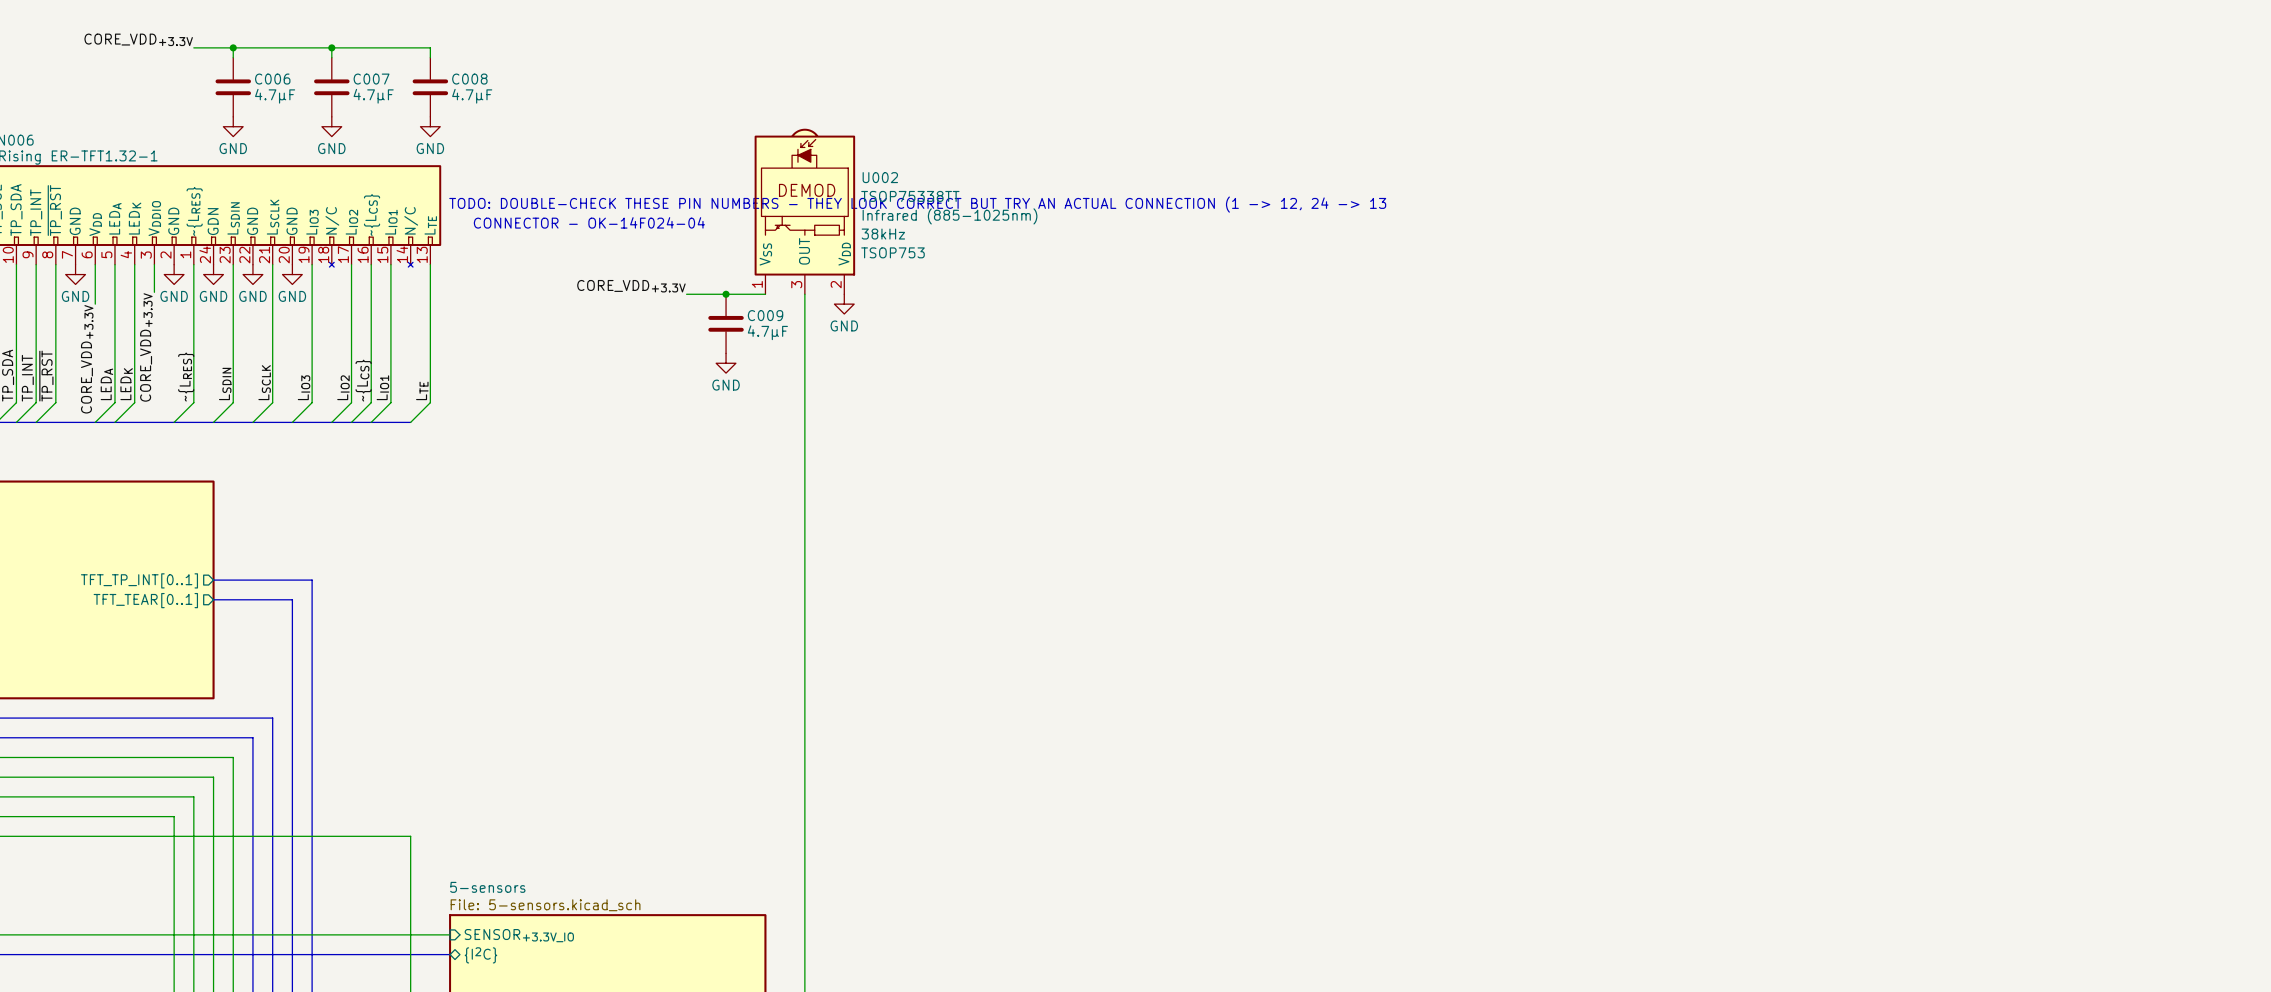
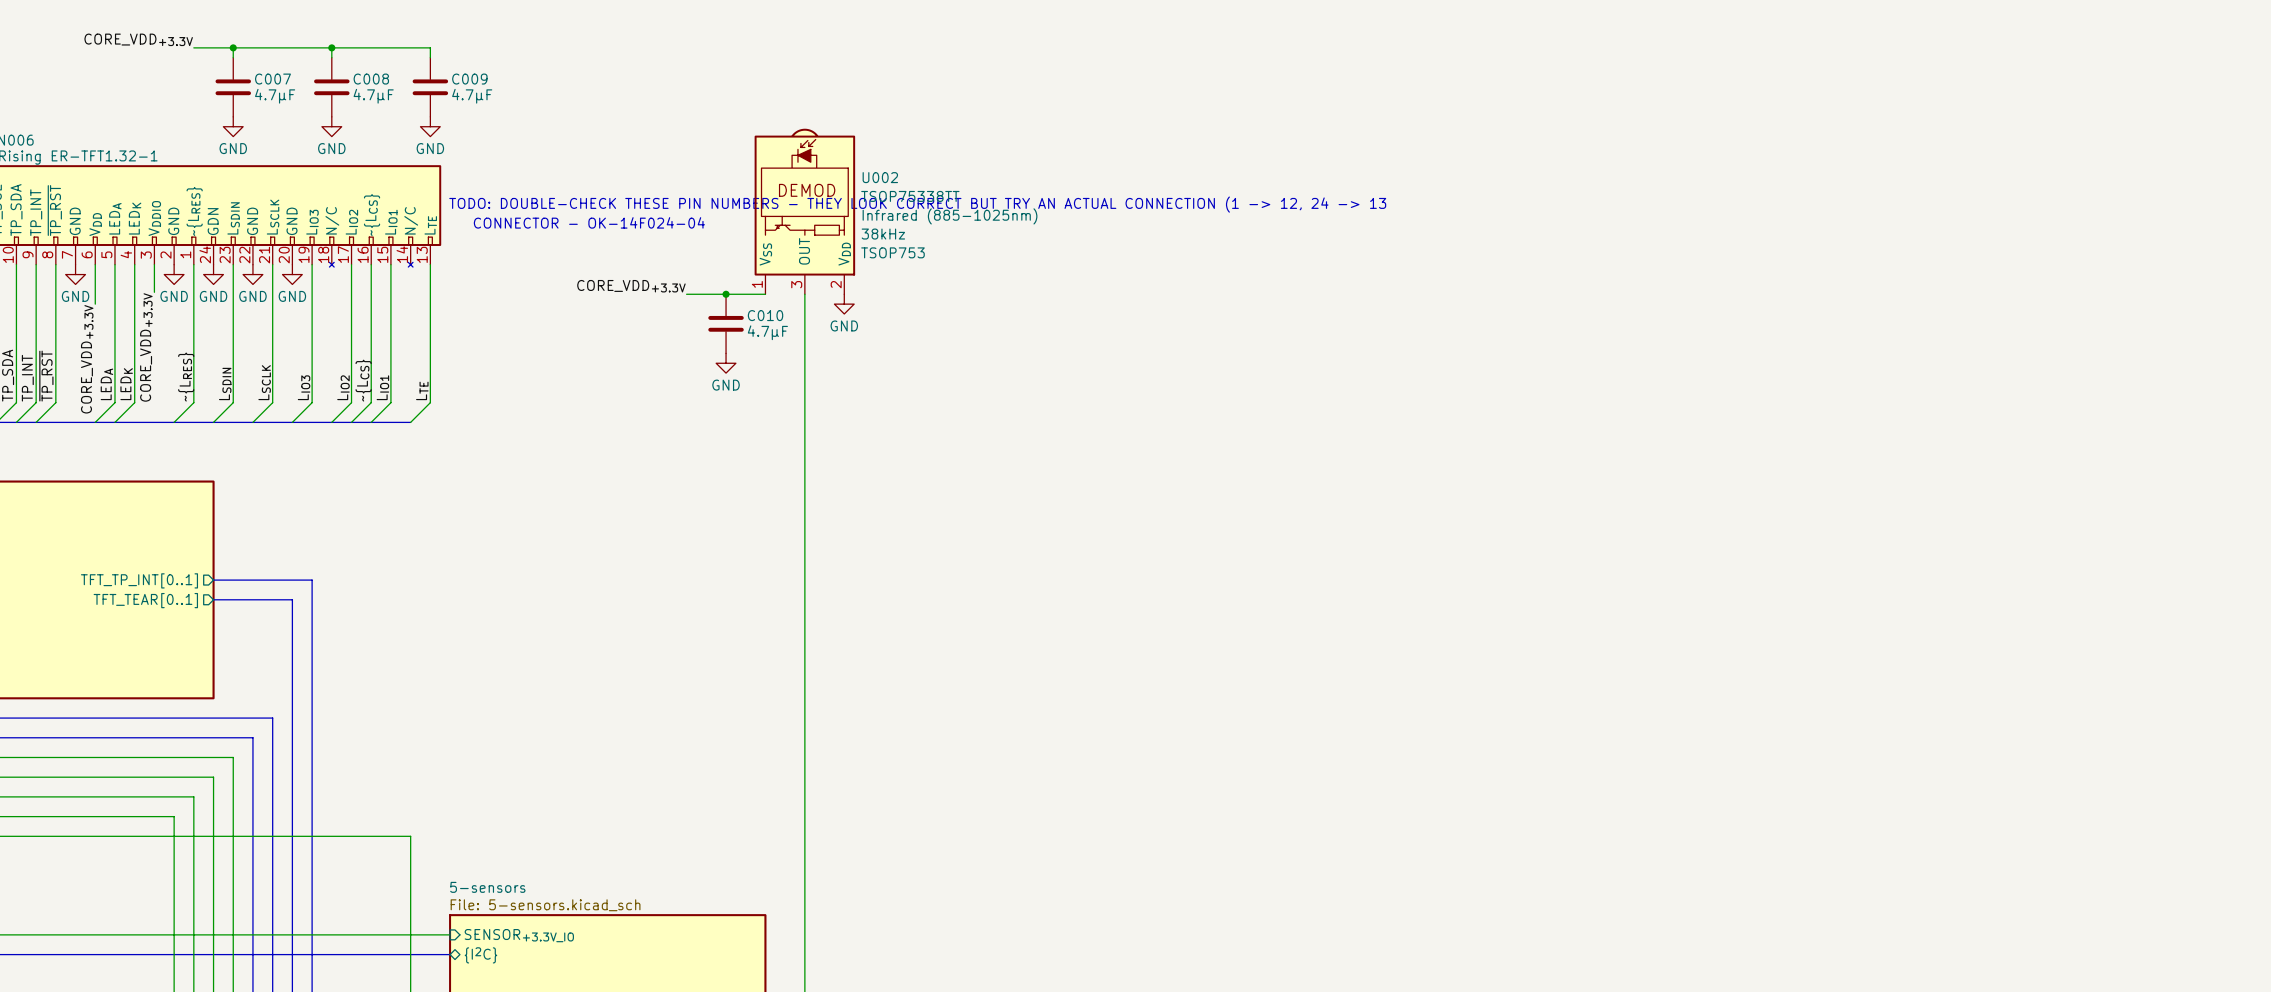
C006 name: C006 (272, 79) -> C007 (272, 79)
C007 name: C007 (371, 79) -> C008 (371, 79)
C008 name: C008 (469, 79) -> C009 (469, 79)
C009 name: C009 (765, 315) -> C010 (765, 315)

